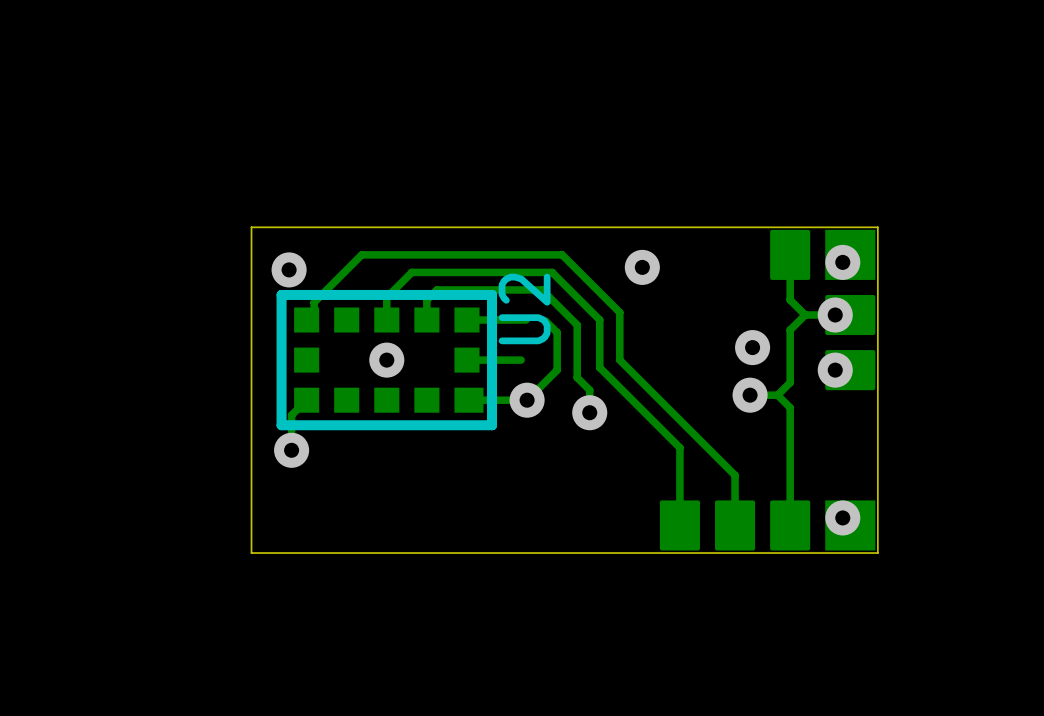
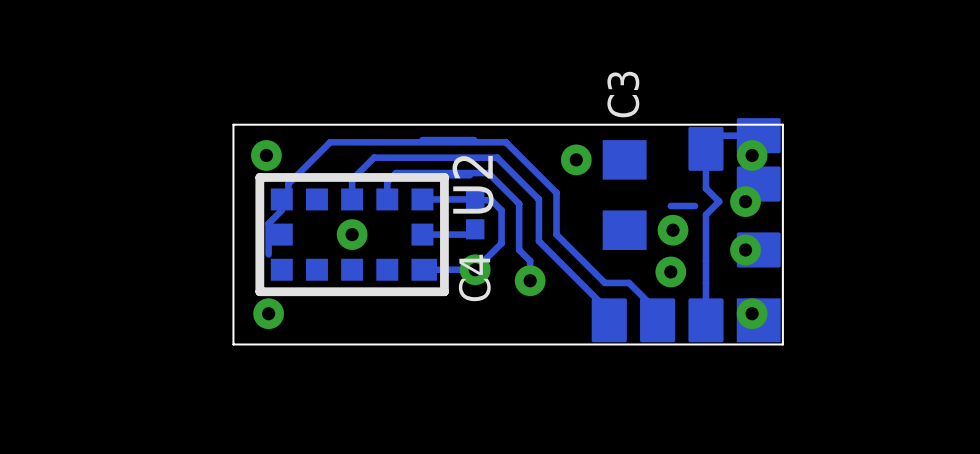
track: (790, 254) (790, 299) (805, 315) (790, 330) -> none
part position: (790, 254) -> (705, 148)
part: (850, 254) -> none
via: (842, 262) -> none
via: (642, 267) -> none
via: (289, 269) -> none
board edge: (877, 302) (877, 227) (251, 227) (251, 302) -> (782, 124) (233, 124)
via: (835, 315) -> none
track: (306, 320) (314, 312) (314, 302) (361, 254) (562, 254) (619, 312) (619, 360) (735, 475) (735, 515) -> (281, 199) (288, 192) (288, 184) (330, 142) (505, 142) (556, 192) (556, 234) (604, 282) (629, 282) (657, 311)
track: (386, 320) (386, 297) (411, 272) (552, 272) (599, 320) (599, 367) (679, 447) (679, 515) -> (352, 199) (352, 179) (374, 157) (497, 157) (538, 199) (538, 241) (609, 311)
track: (426, 320) (426, 299) (436, 289) (542, 289) (577, 325) (577, 377) (589, 390) (589, 412) -> (387, 199) (387, 181) (396, 173) (488, 173) (519, 203) (519, 249) (530, 260) (530, 280)
track: (545, 321) (557, 332) (557, 370) (527, 400) (468, 400) -> none
via: none -> (266, 155)
via: none -> (752, 155)
via: none -> (576, 159)
via: (752, 347) -> none
U2 position: (386, 360) -> (352, 234)
via: (386, 360) -> none
via: (835, 370) -> none
track: (790, 375) (790, 382) (777, 395) (790, 407) -> (705, 188) (719, 201) (705, 217)
C3: none -> (624, 195)
track: none -> (422, 199) (491, 200) (501, 210) (501, 243) (475, 269) (424, 269)
via: none -> (745, 201)
via position: (750, 395) -> (673, 230)
via: (527, 400) -> none
C4: none -> (475, 214)
via: (589, 412) -> none
track: none -> (475, 229) (469, 234) (422, 234)
via: none -> (352, 234)
via: none -> (745, 249)
part: none -> (758, 249)
via: (291, 450) -> none
via: none -> (475, 269)
via: none -> (670, 271)
via: none -> (530, 280)
via: none -> (268, 313)

